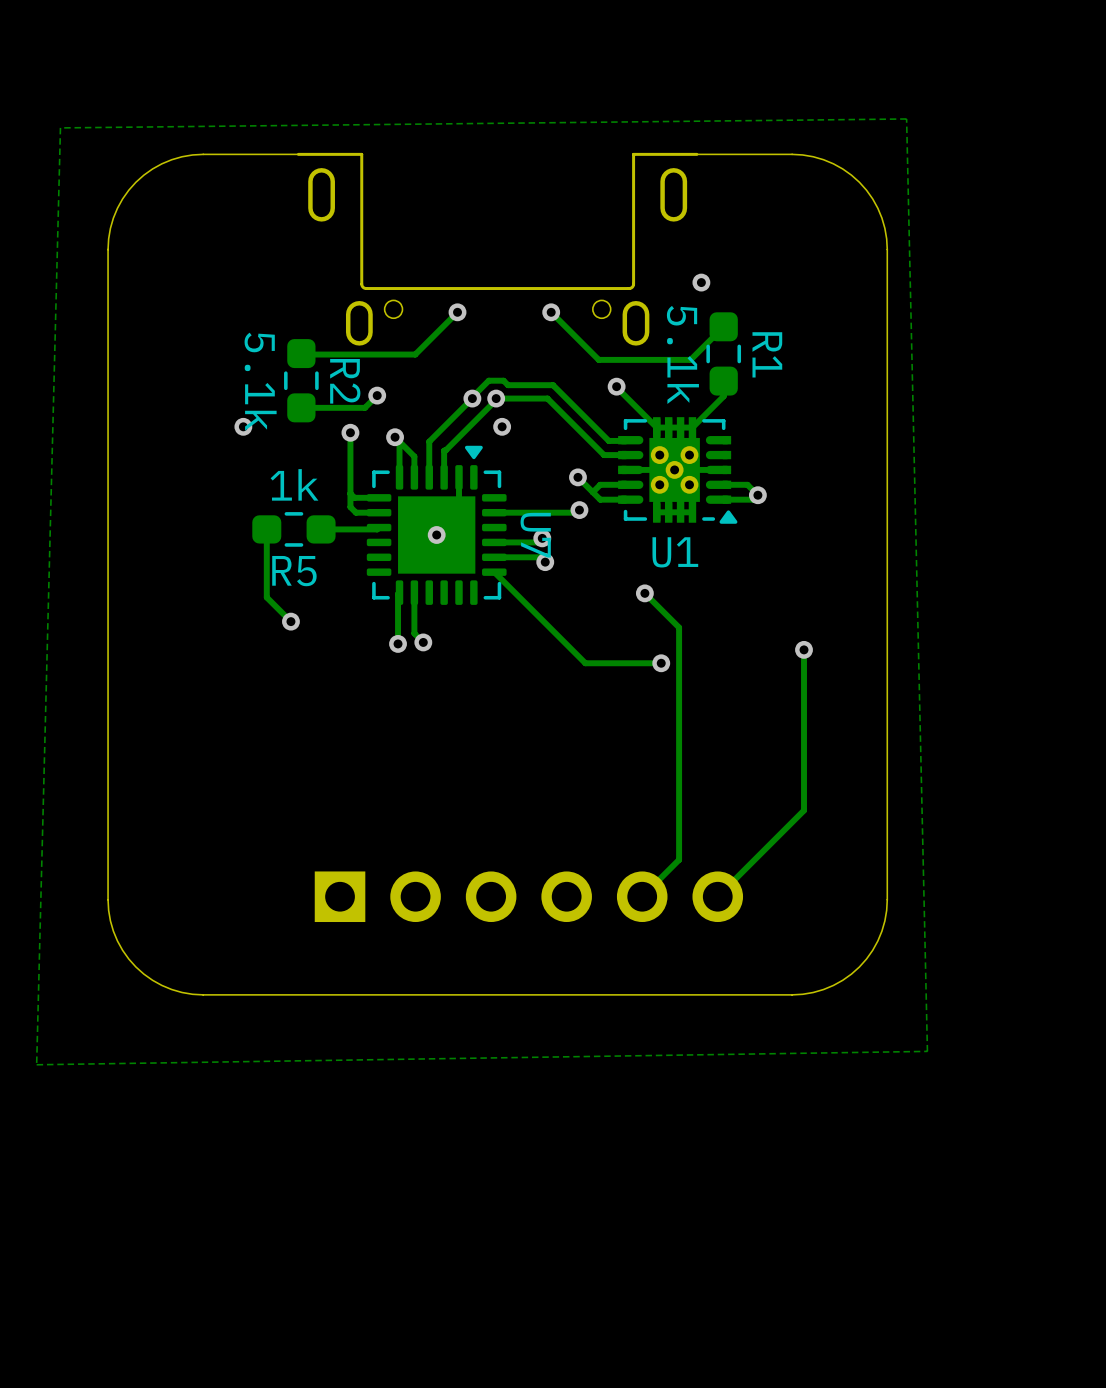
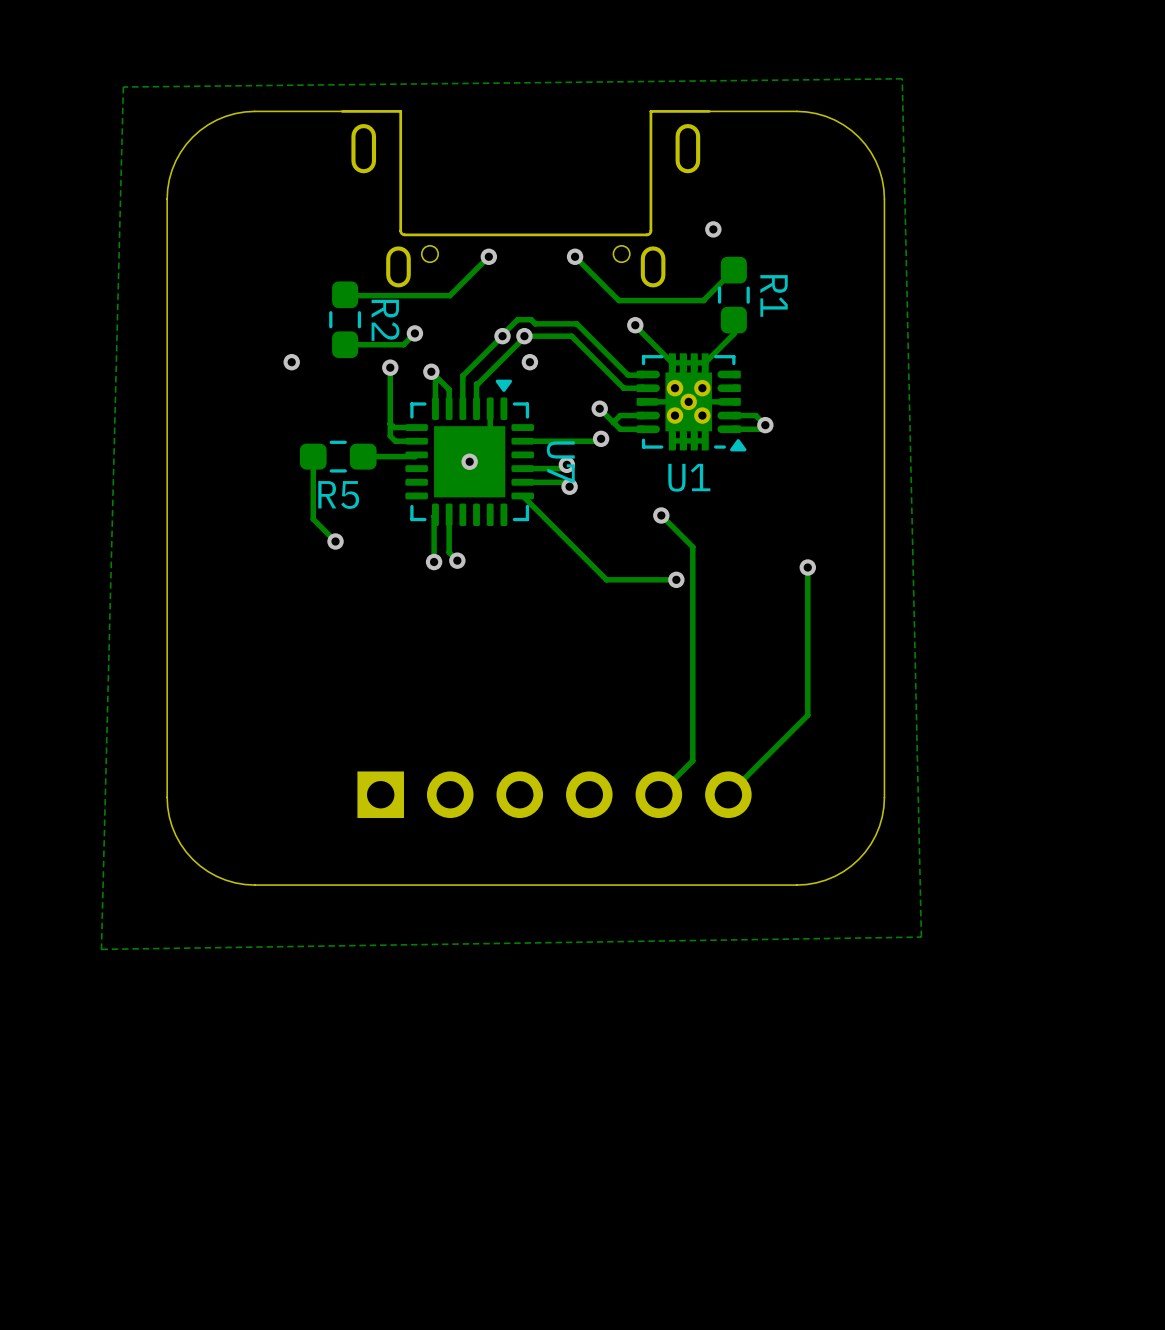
R1 value: 5.1k (682, 354) -> none
R2 value: 5.1k (260, 381) -> none
R5 value: 1k (294, 484) -> none

